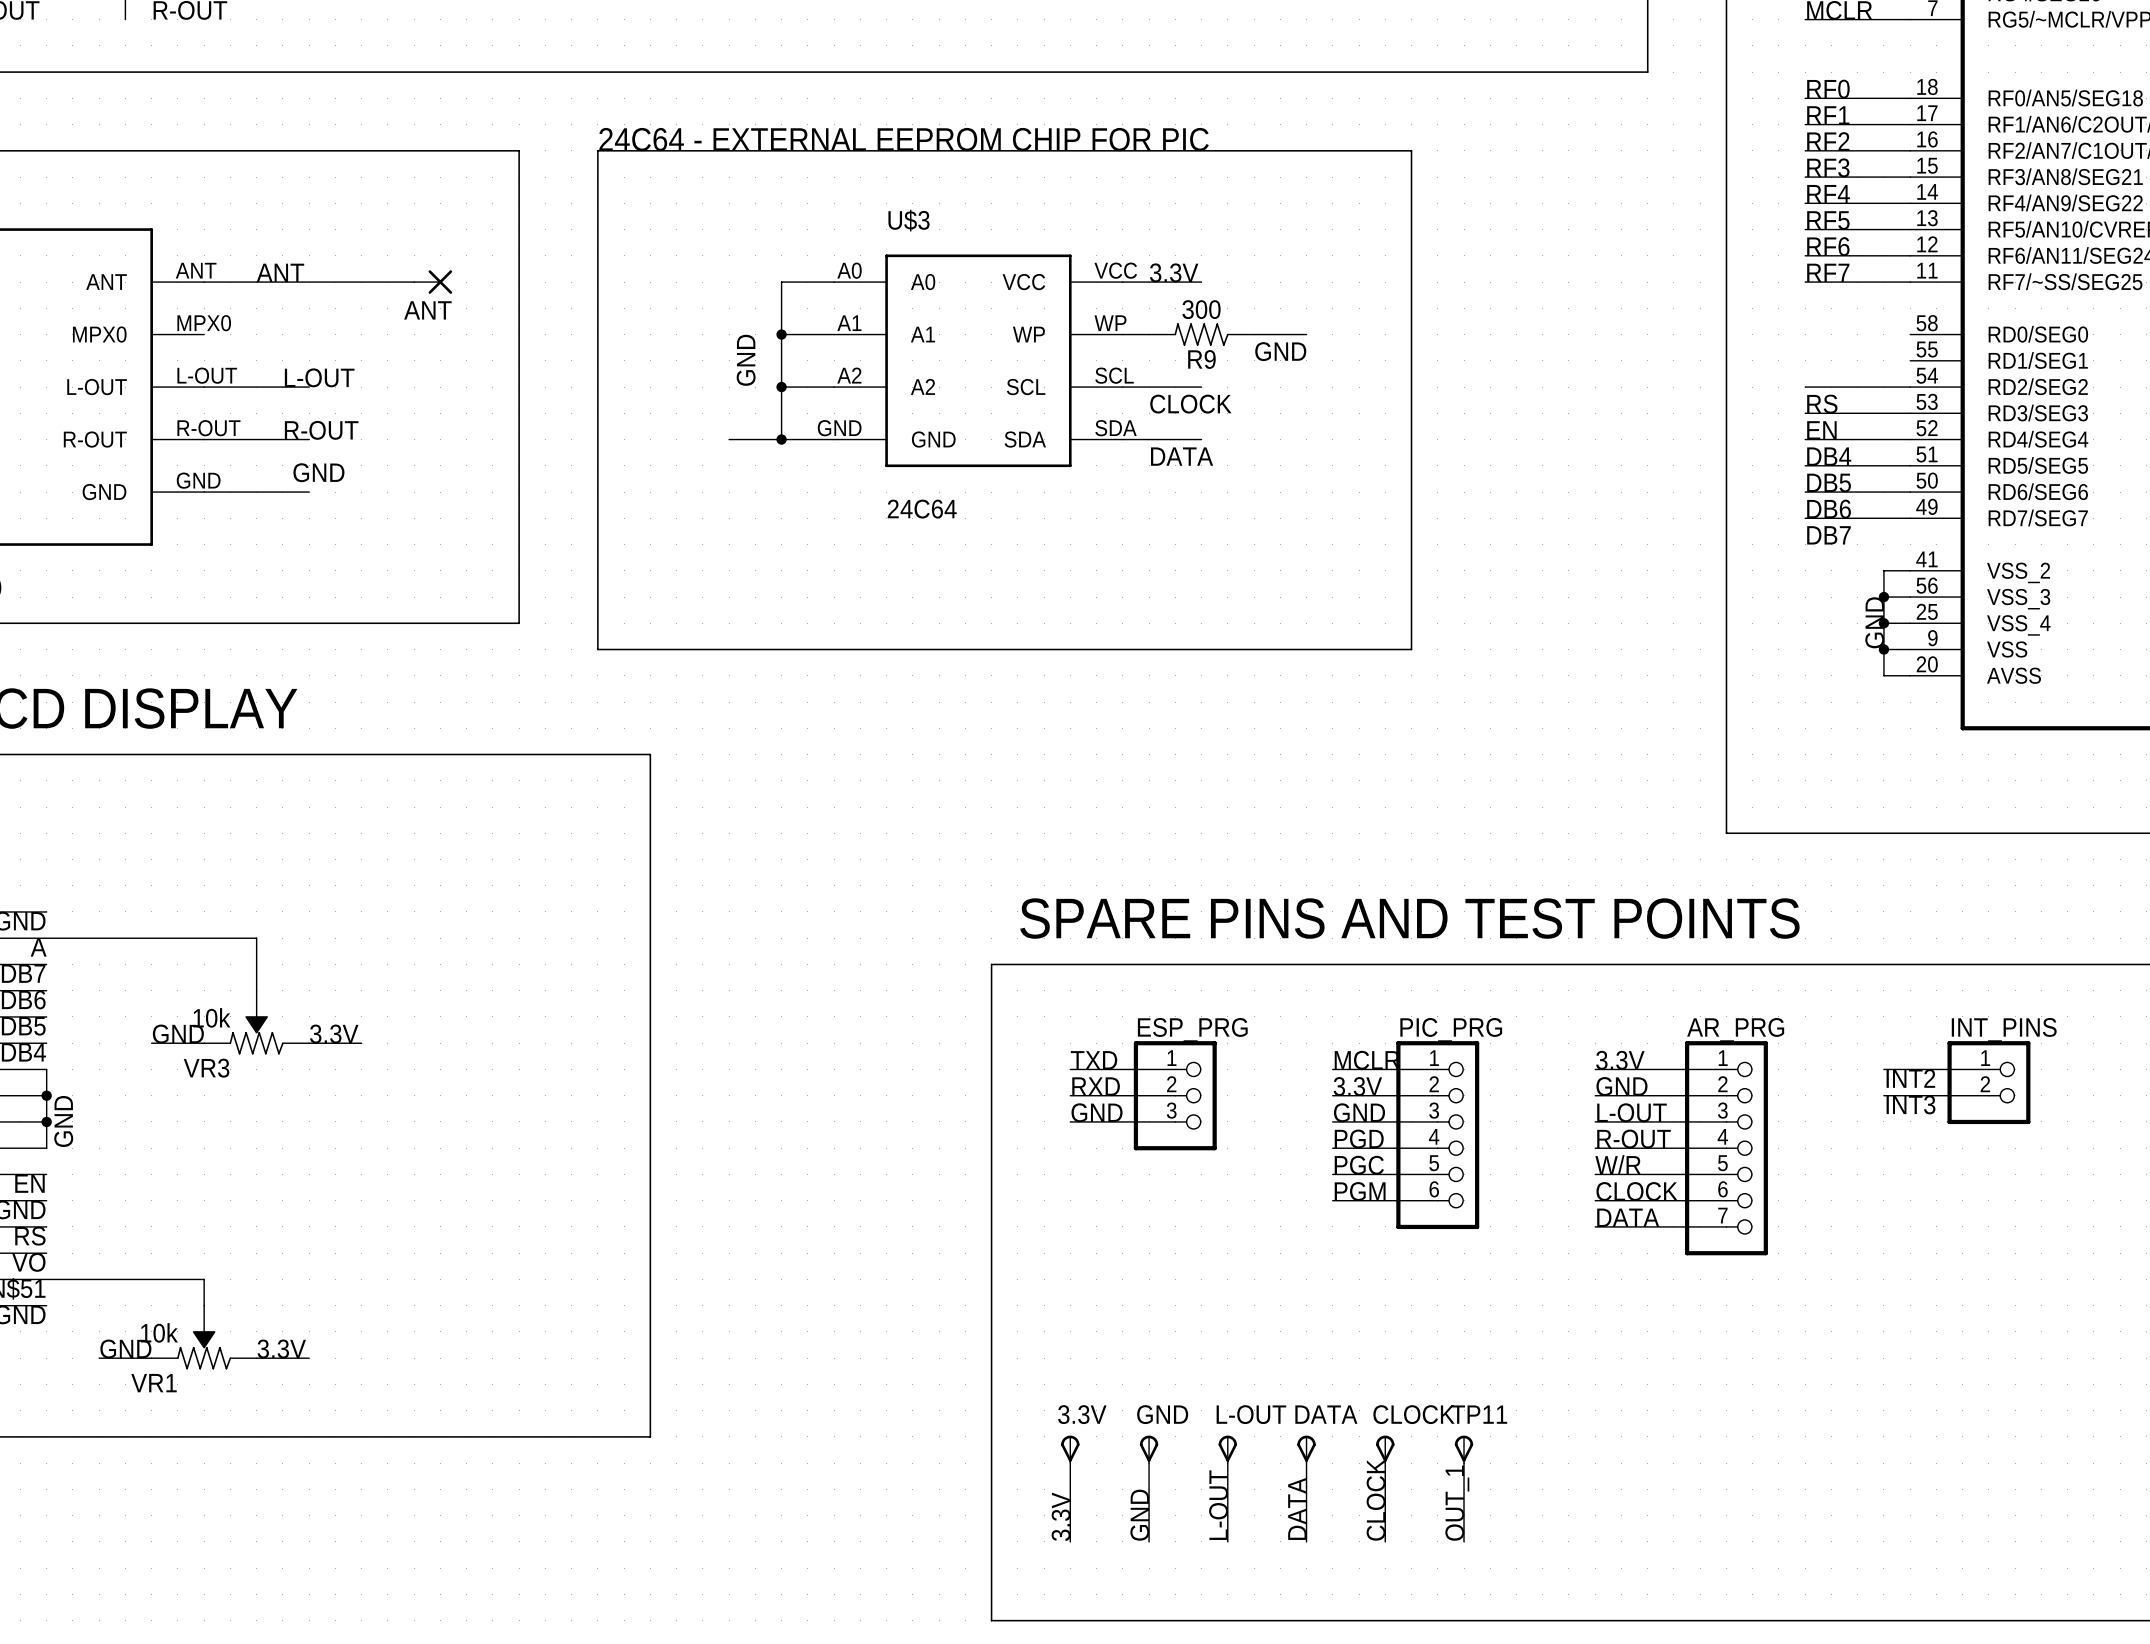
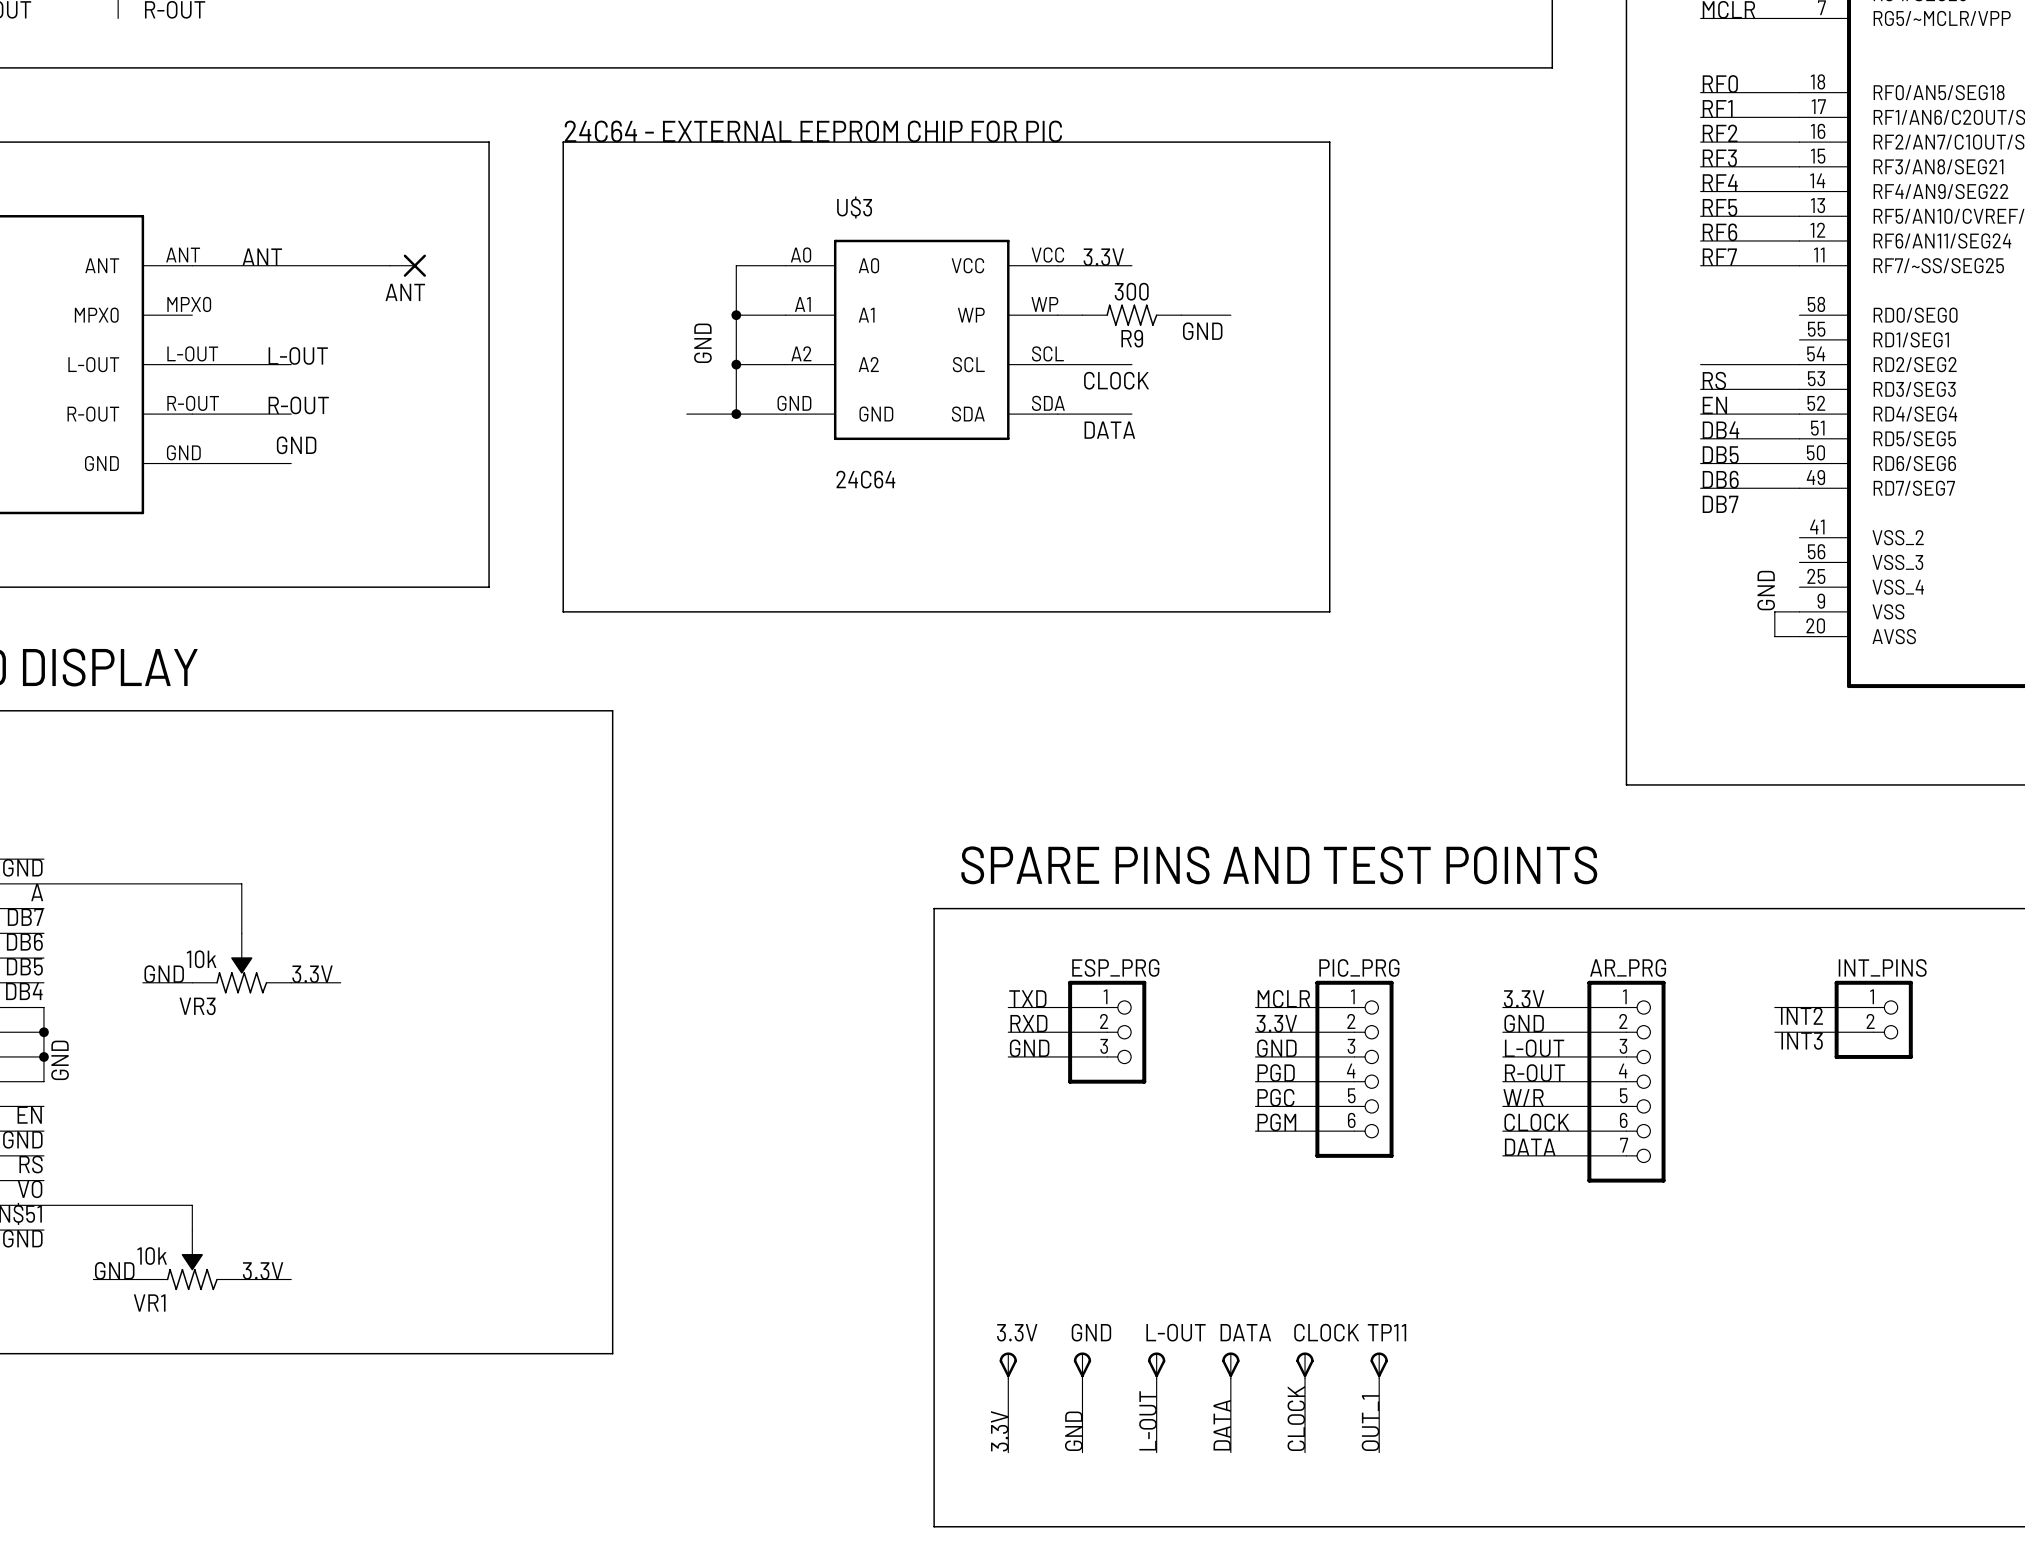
wire: (1910, 570) (1883, 570) (1883, 649) -> none
wire: (1883, 597) (1910, 597) -> none
junction: (1883, 597) -> none
wire: (1883, 623) (1910, 623) -> none
junction: (1883, 623) -> none
junction: (1883, 649) -> none

